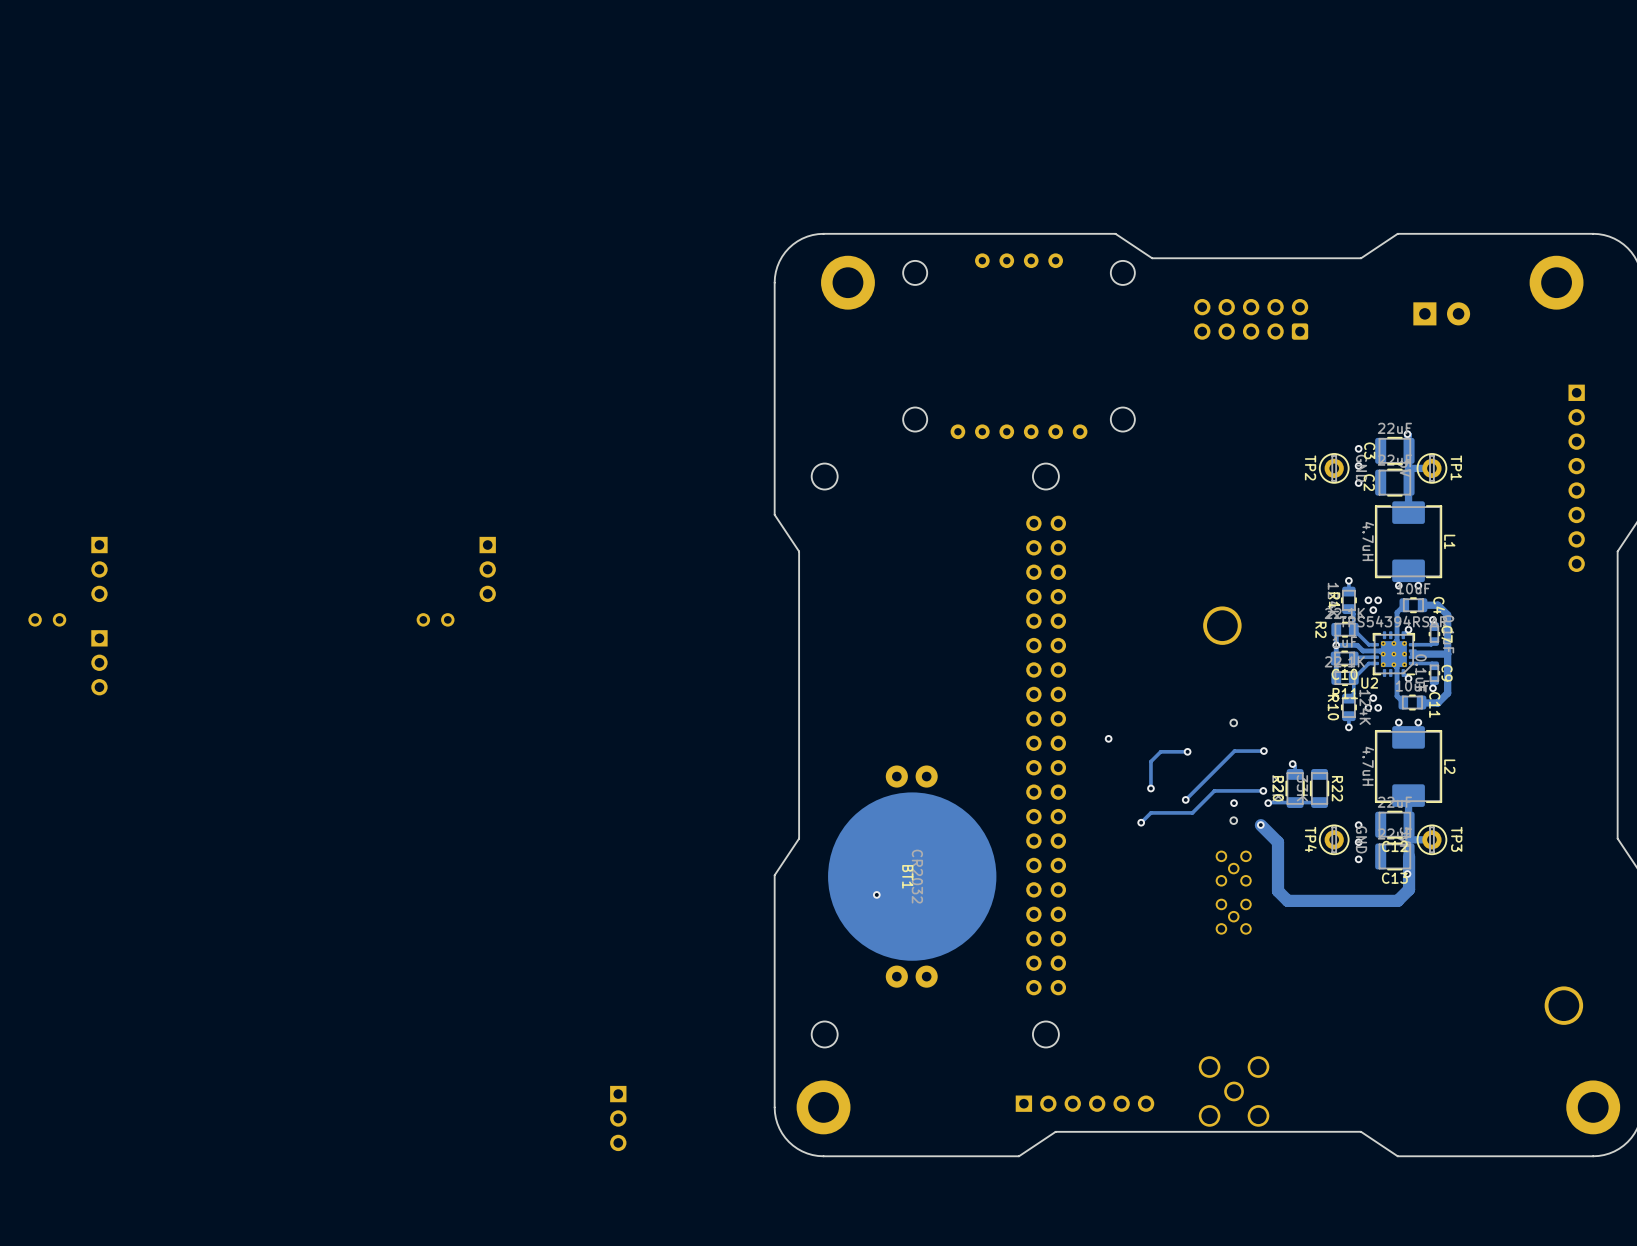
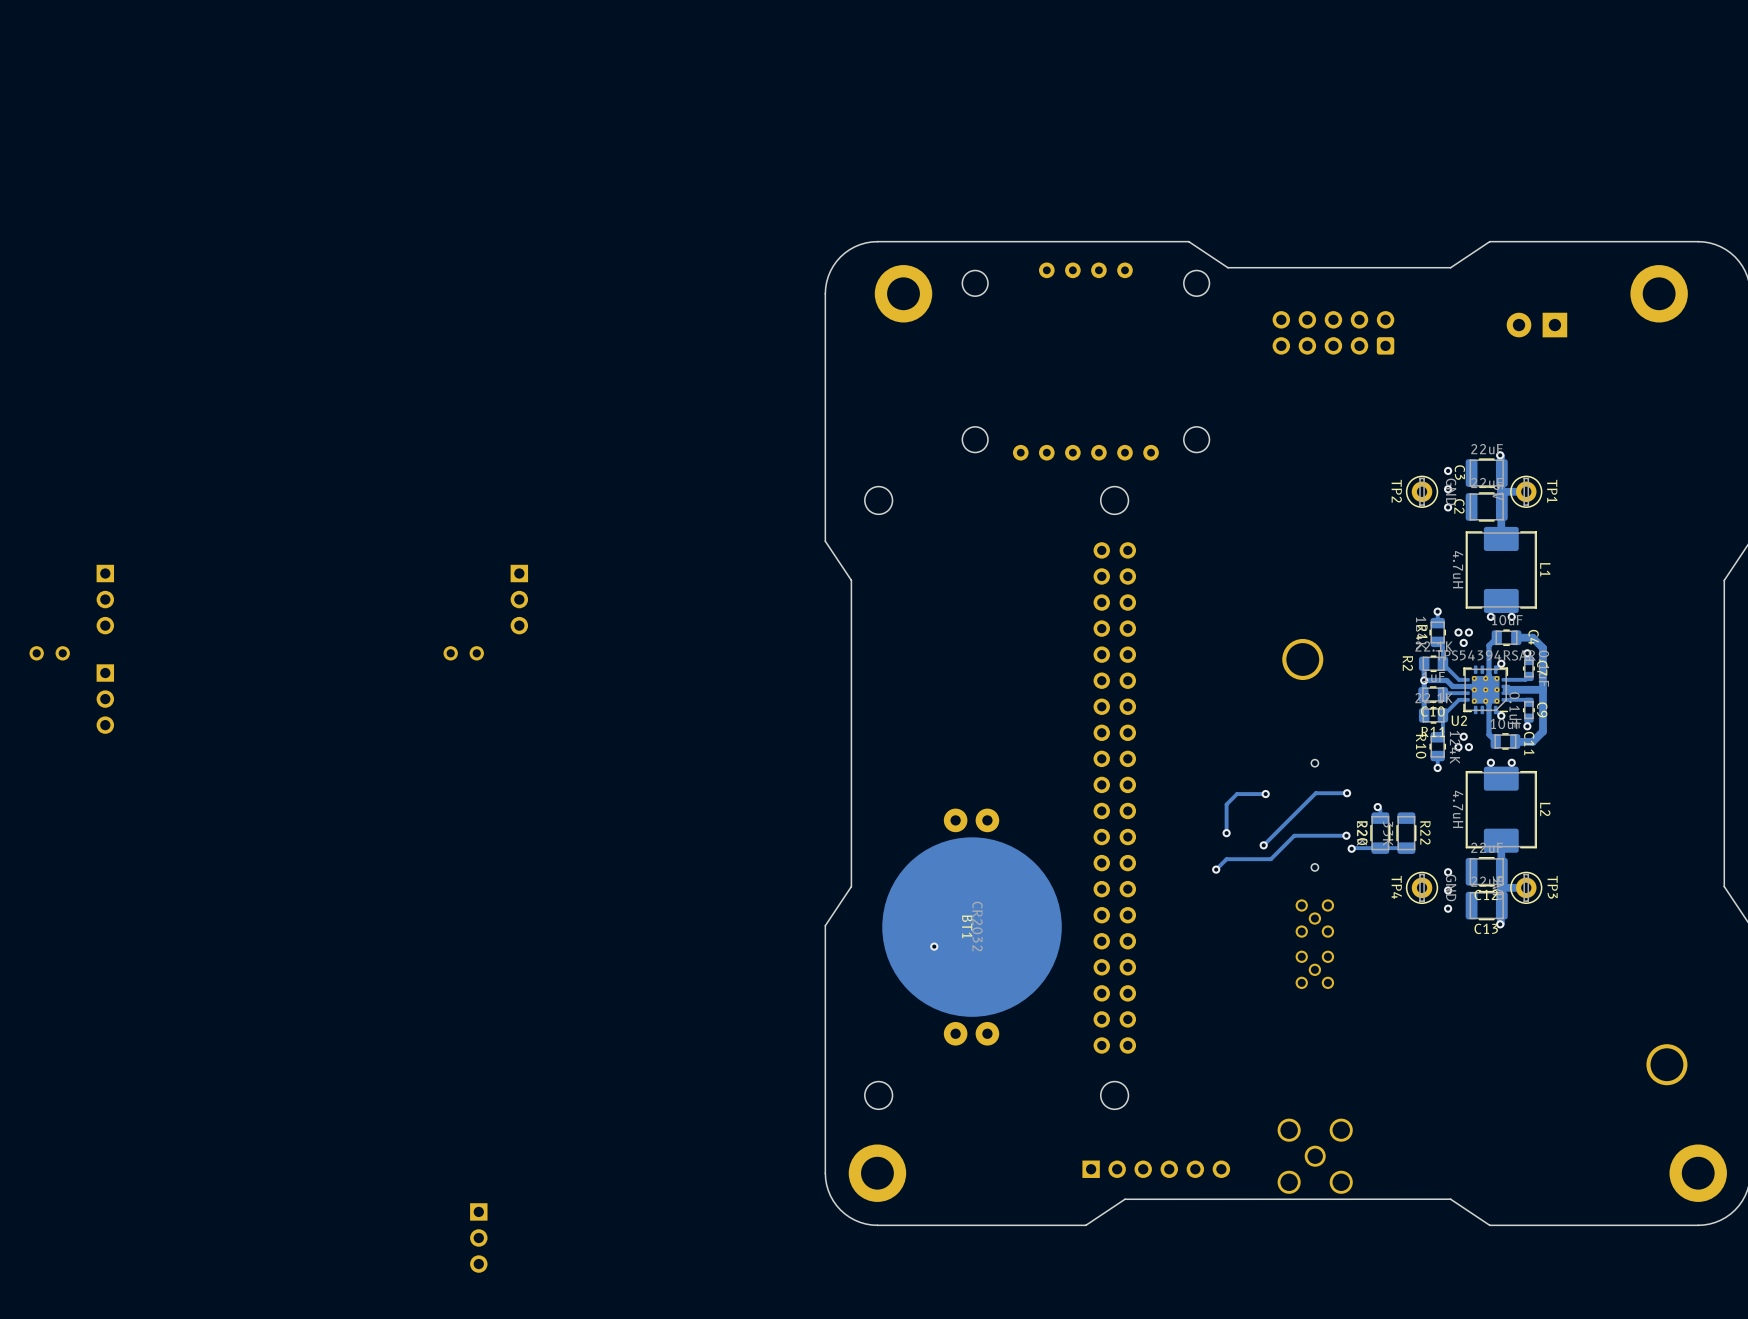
part rotation: 0° (1441, 313) -> 180° (1536, 325)
part: (1576, 478) -> none
via: (1108, 738) -> none
via: (1234, 803) -> none
track: (1260, 825) (1278, 842) (1278, 891) (1287, 900) (1397, 900) (1409, 889) (1409, 856) -> none
via: (1260, 825) -> none
part position: (618, 1118) -> (478, 1237)

